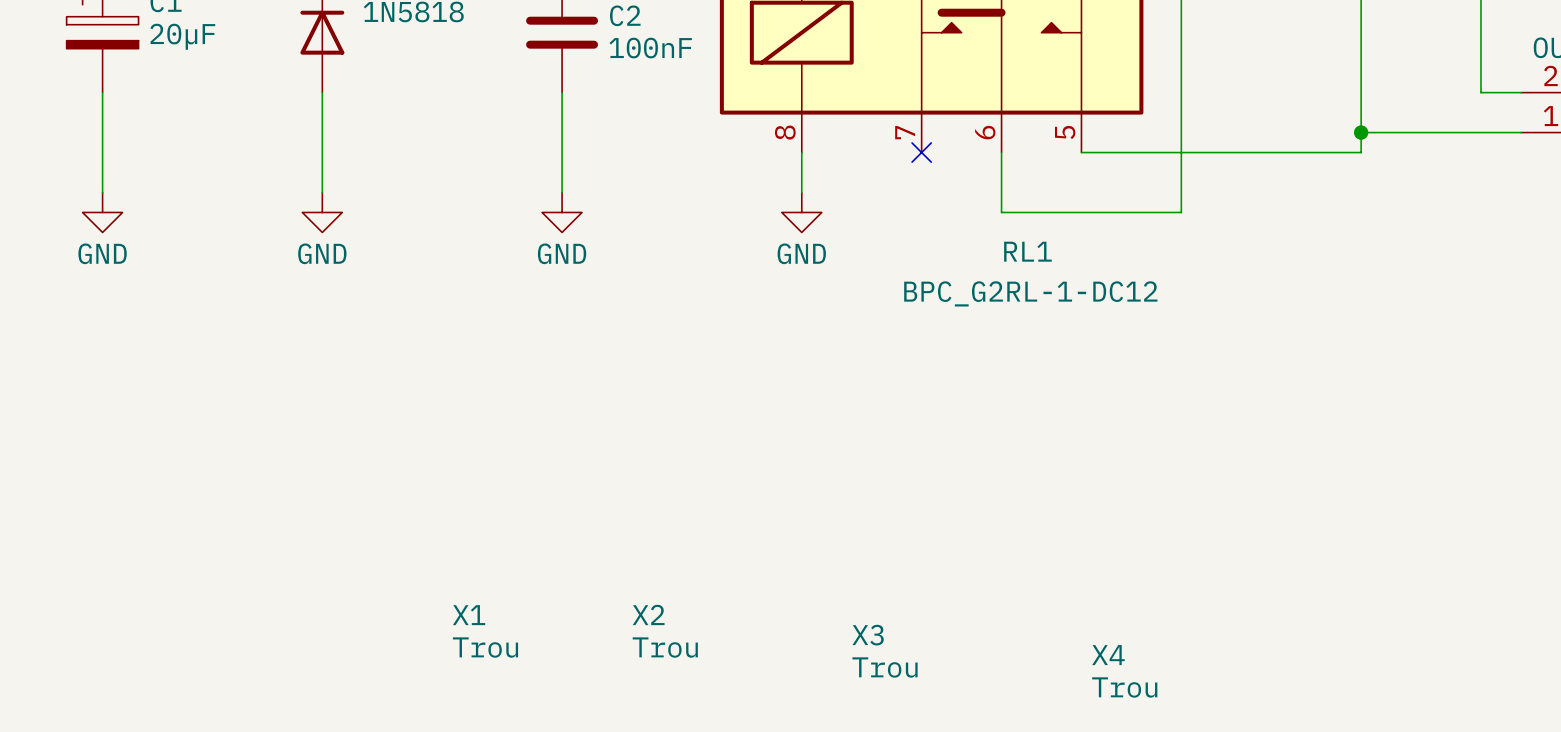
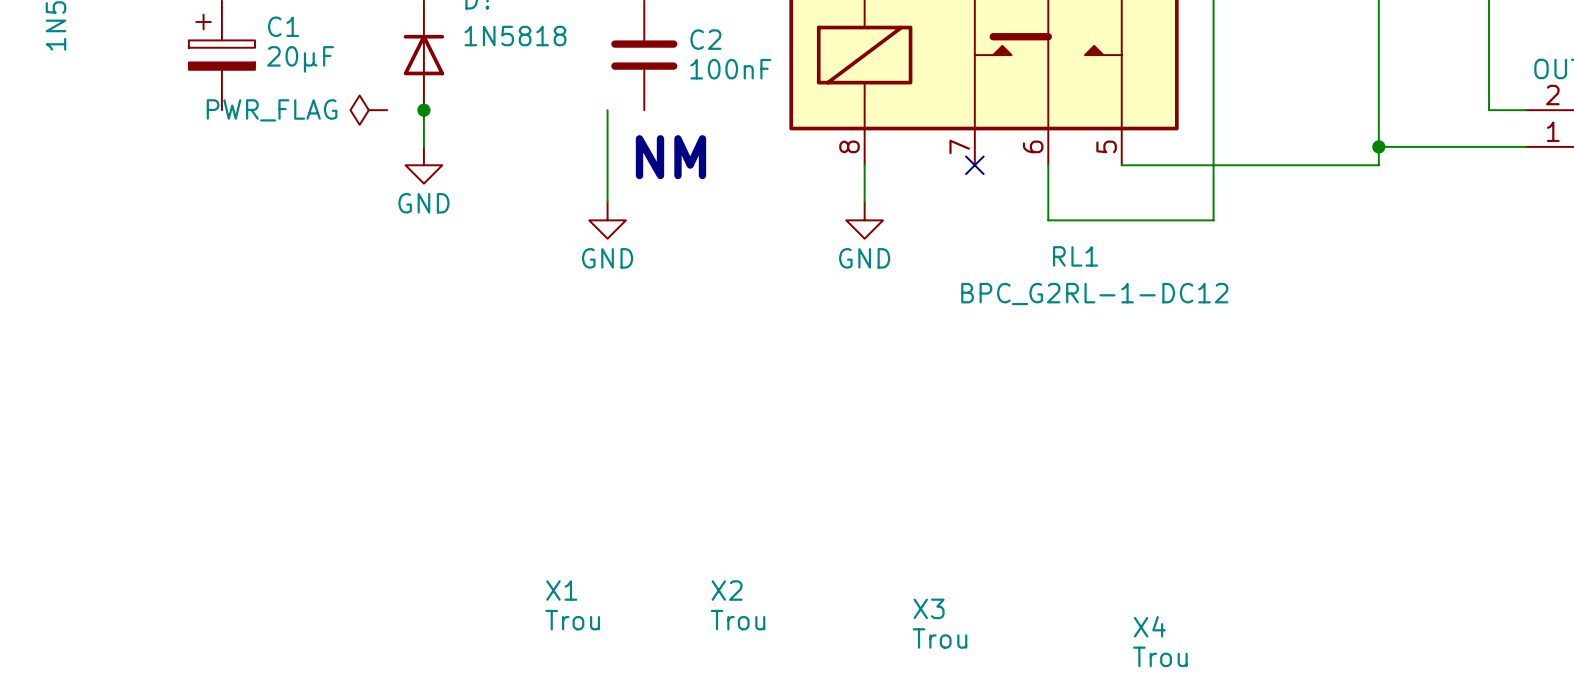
wire: (102, 92) (102, 192) -> none
power symbol: none -> PWR_FLAG (368, 110)
junction: none -> (423, 110)
wire: (562, 92) (562, 192) -> (607, 110) (607, 201)
wire: (322, 132) (322, 192) -> none
text: none -> NM (670, 157)
power symbol: GND (102, 212) -> none
power symbol position: GND (322, 212) -> GND (423, 165)
power symbol position: GND (562, 212) -> GND (607, 220)

